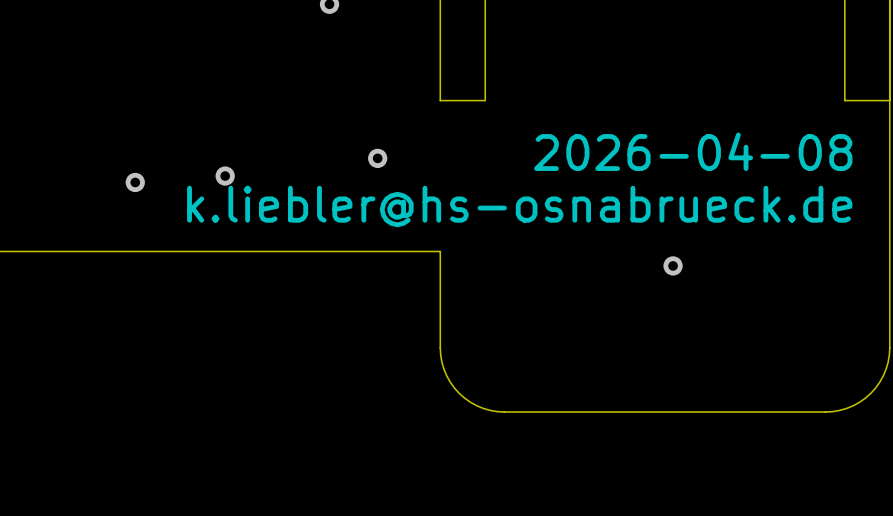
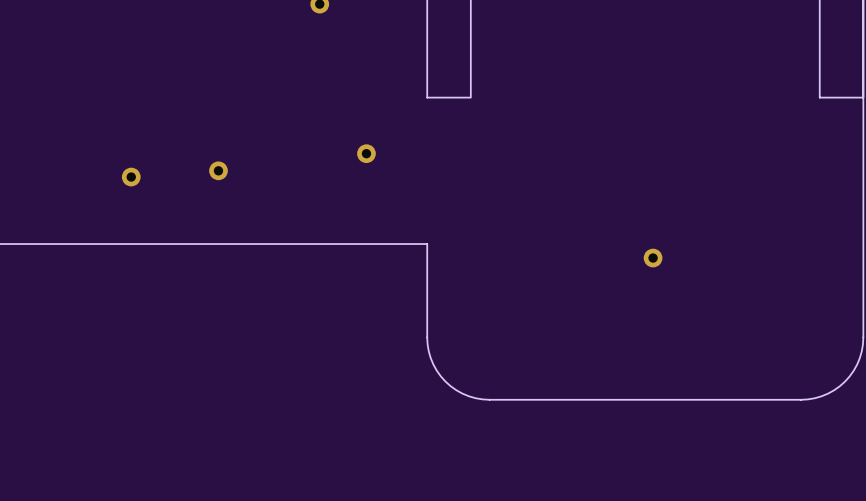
text: 2026-04-08 (693, 151) -> none
text: k.liebler@hs-osnabrueck.de (519, 206) -> none

